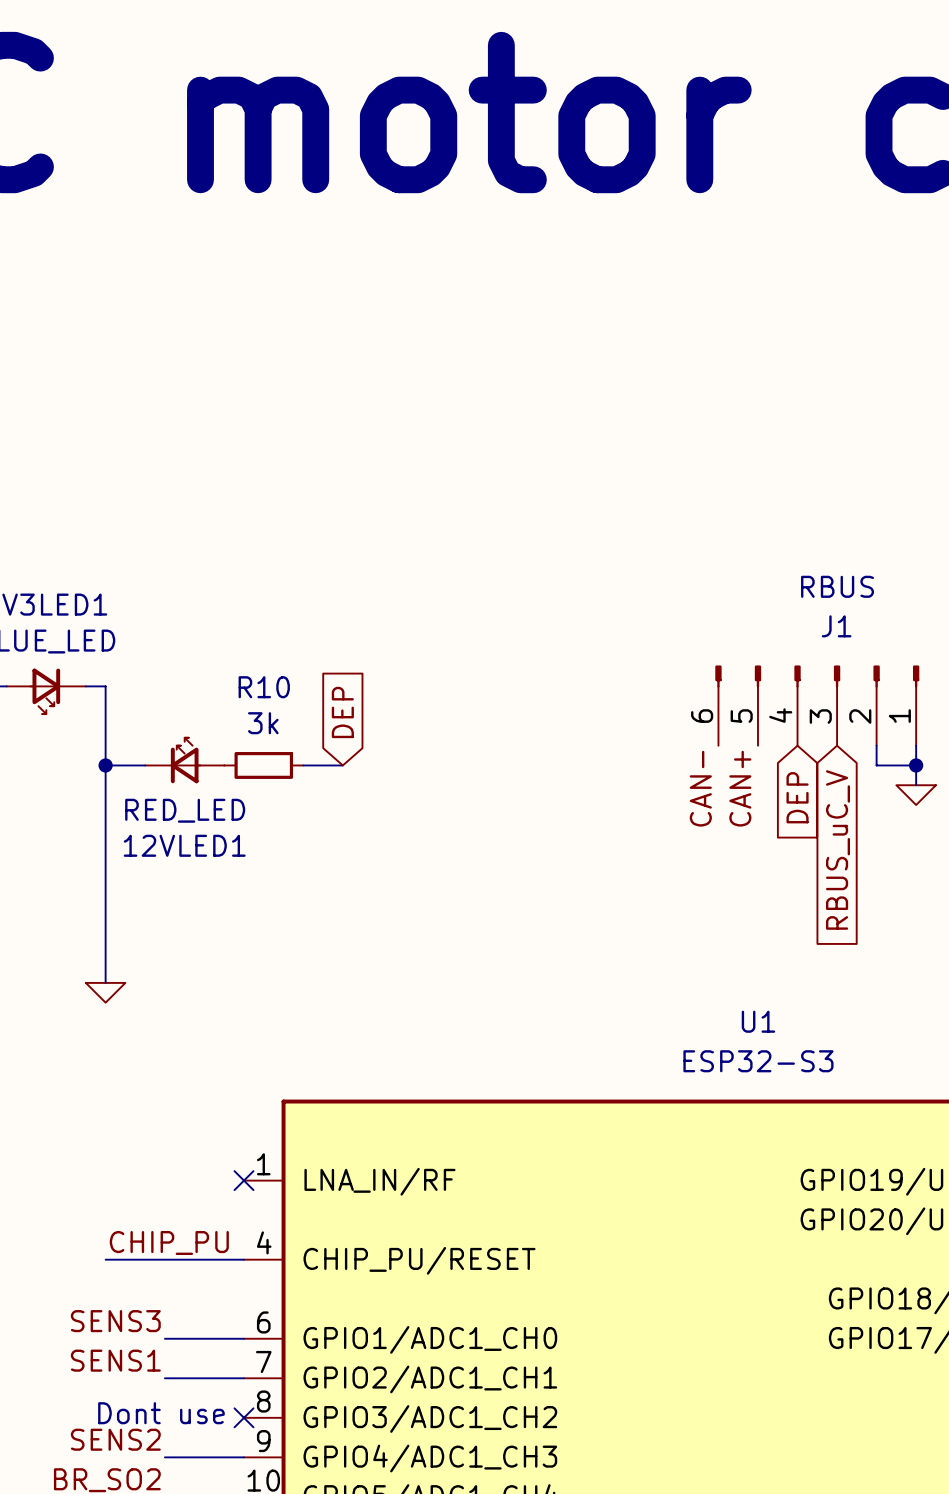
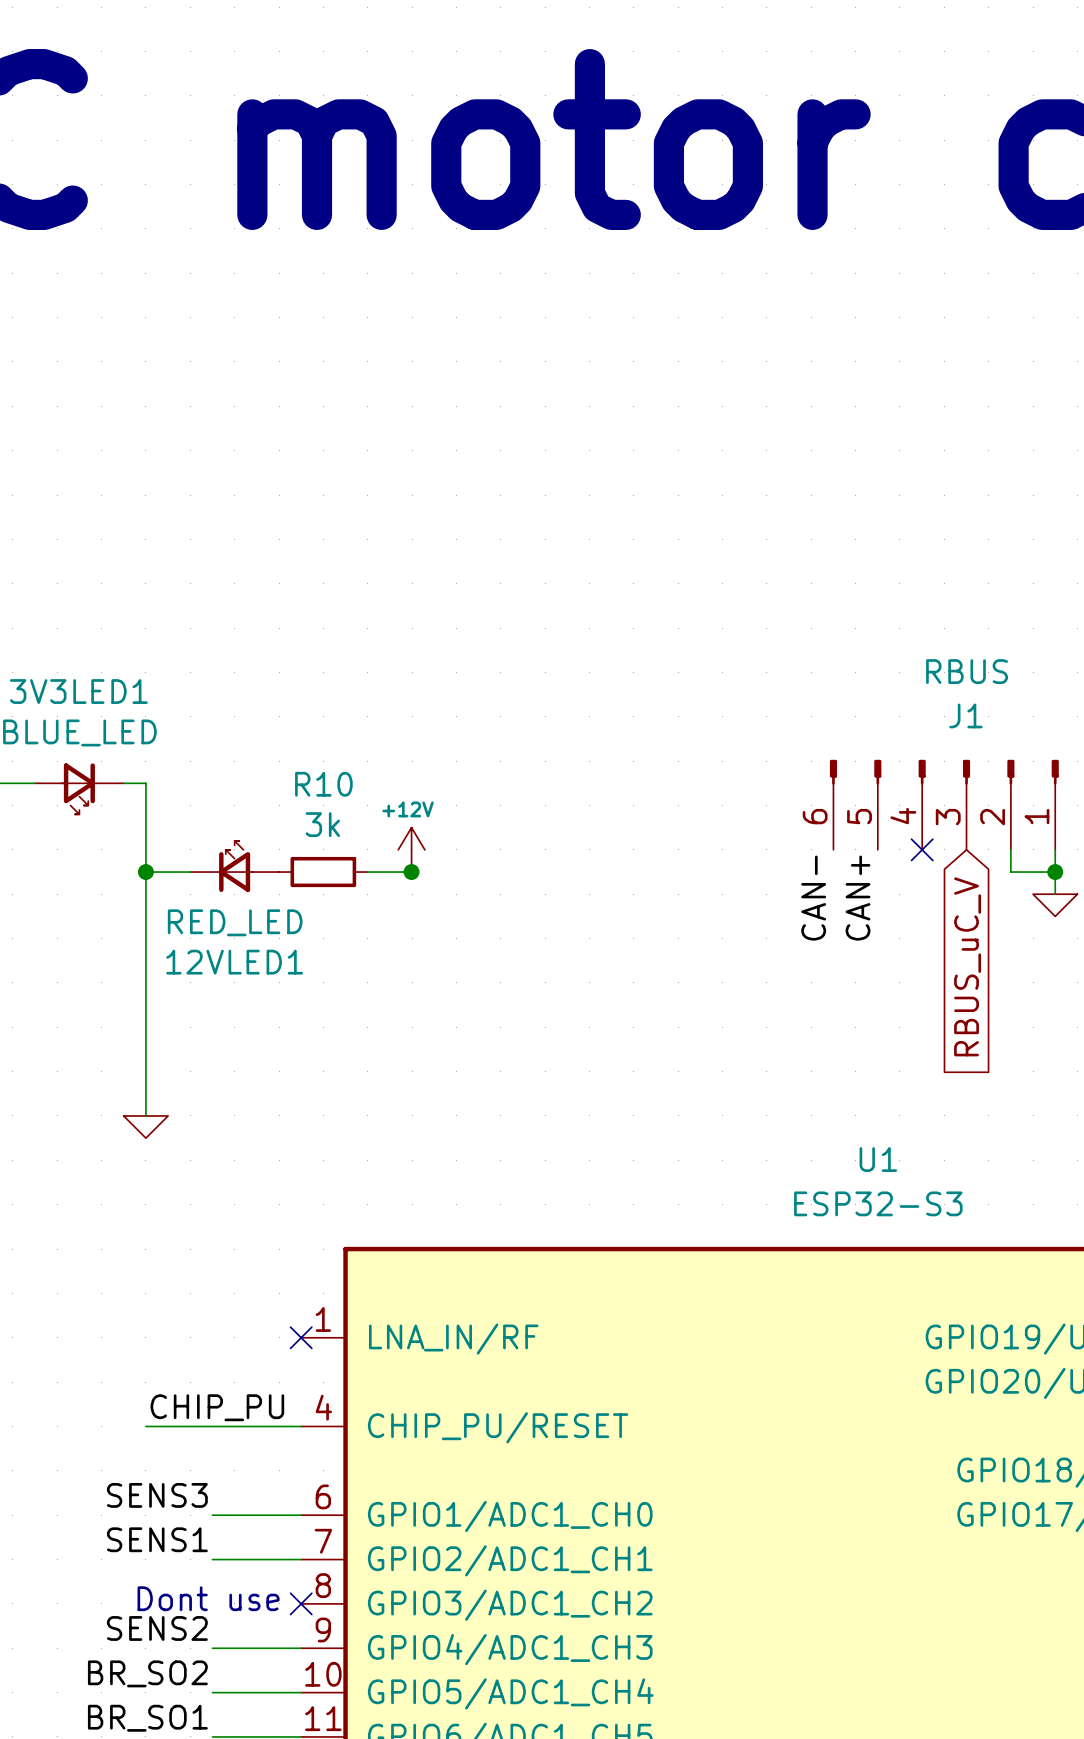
global label: DEP (342, 712) -> none
power symbol: none -> +12V (411, 849)
no-connect mark: none -> (922, 849)
junction: none -> (411, 872)
global label: DEP (797, 797) -> none

